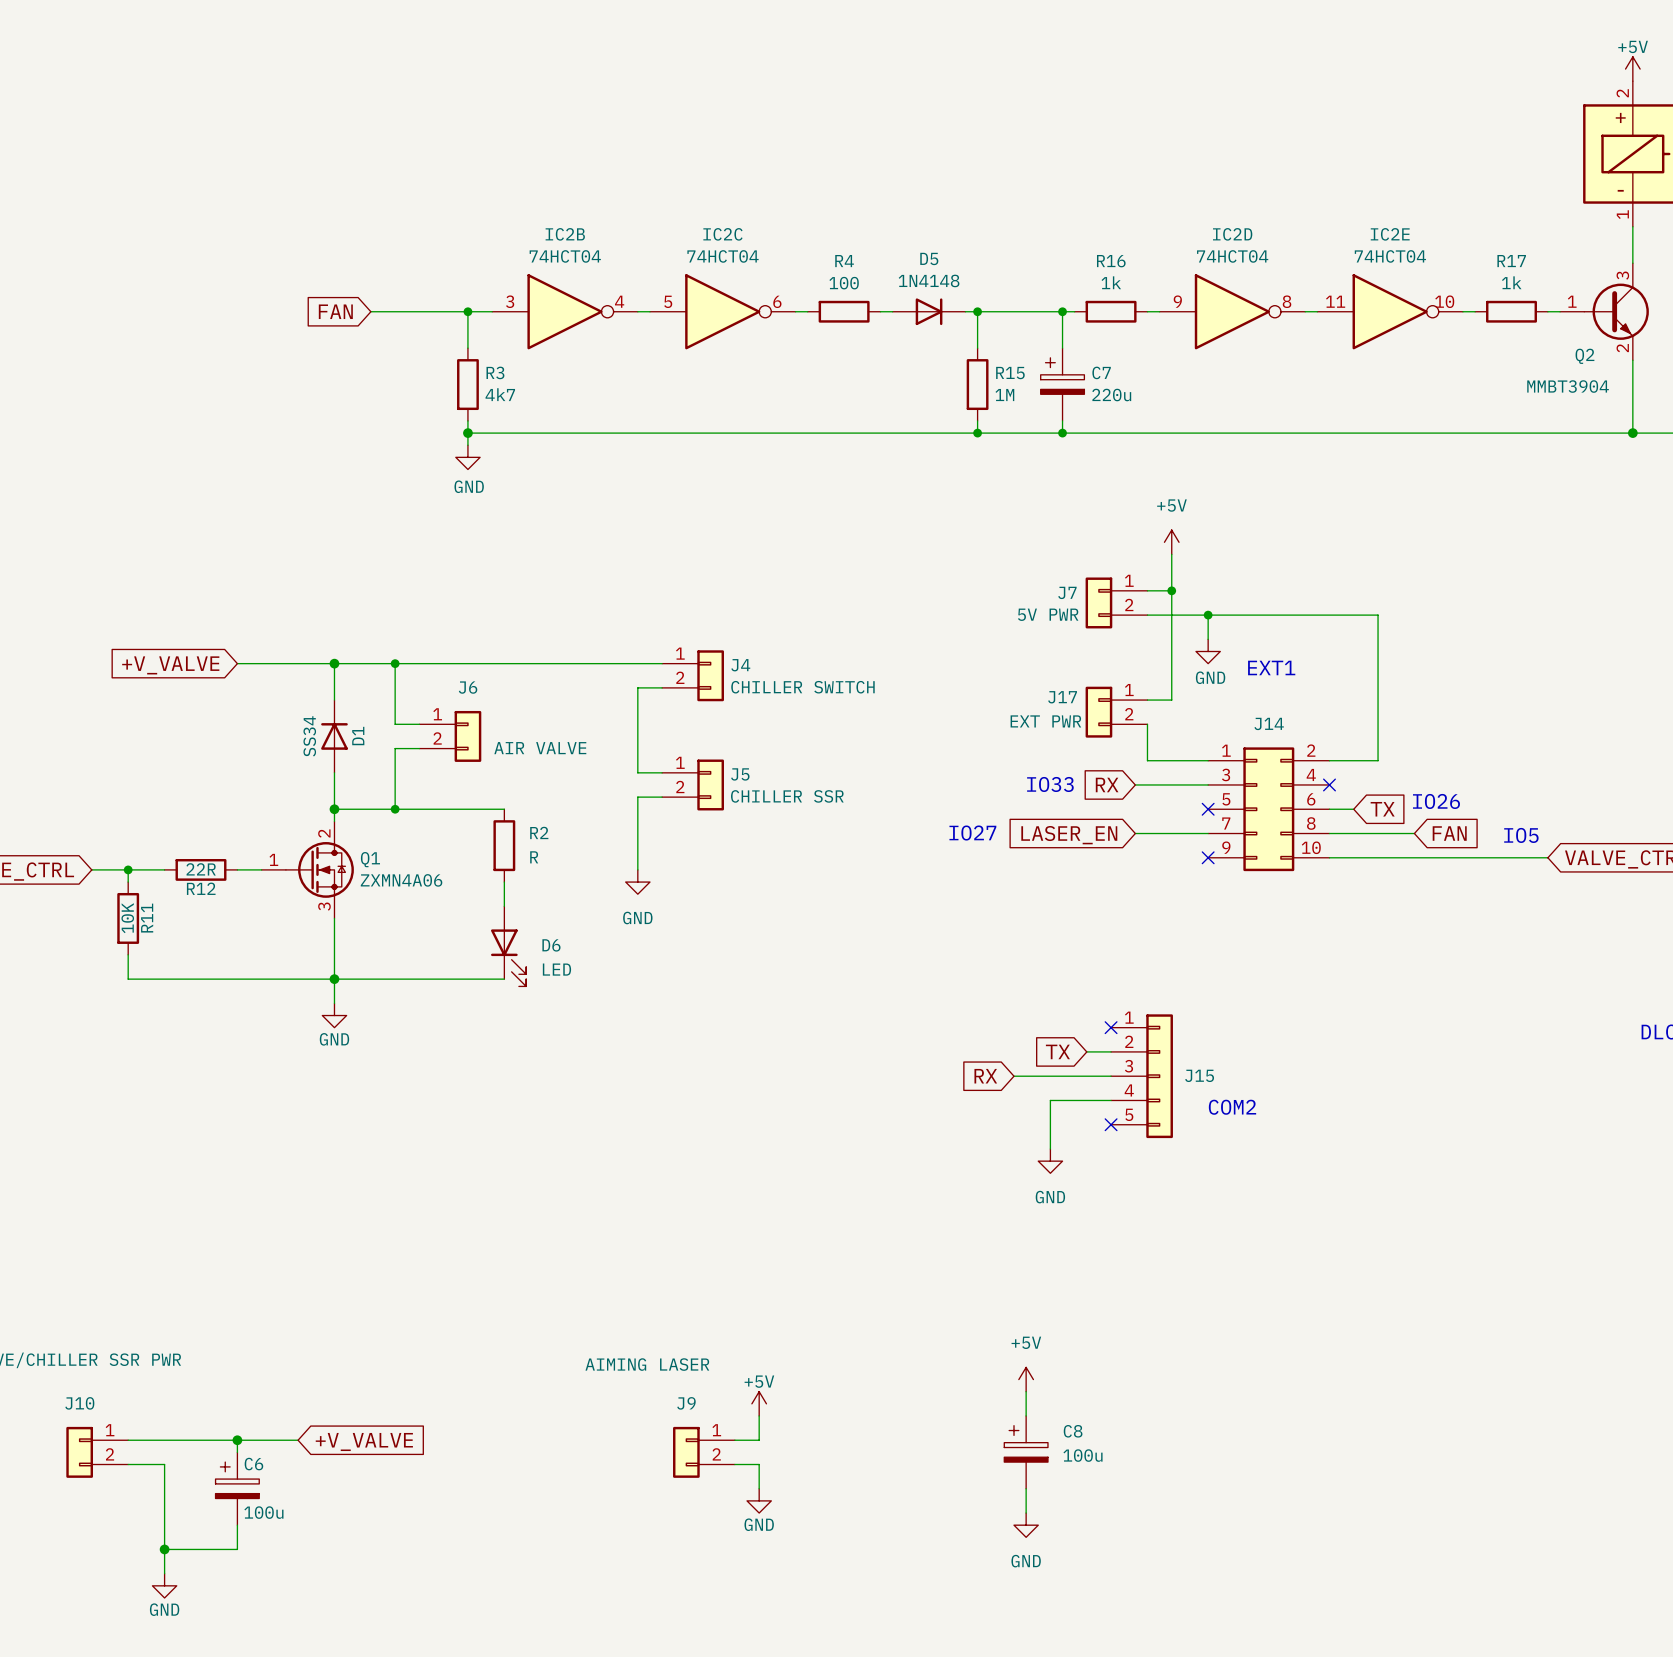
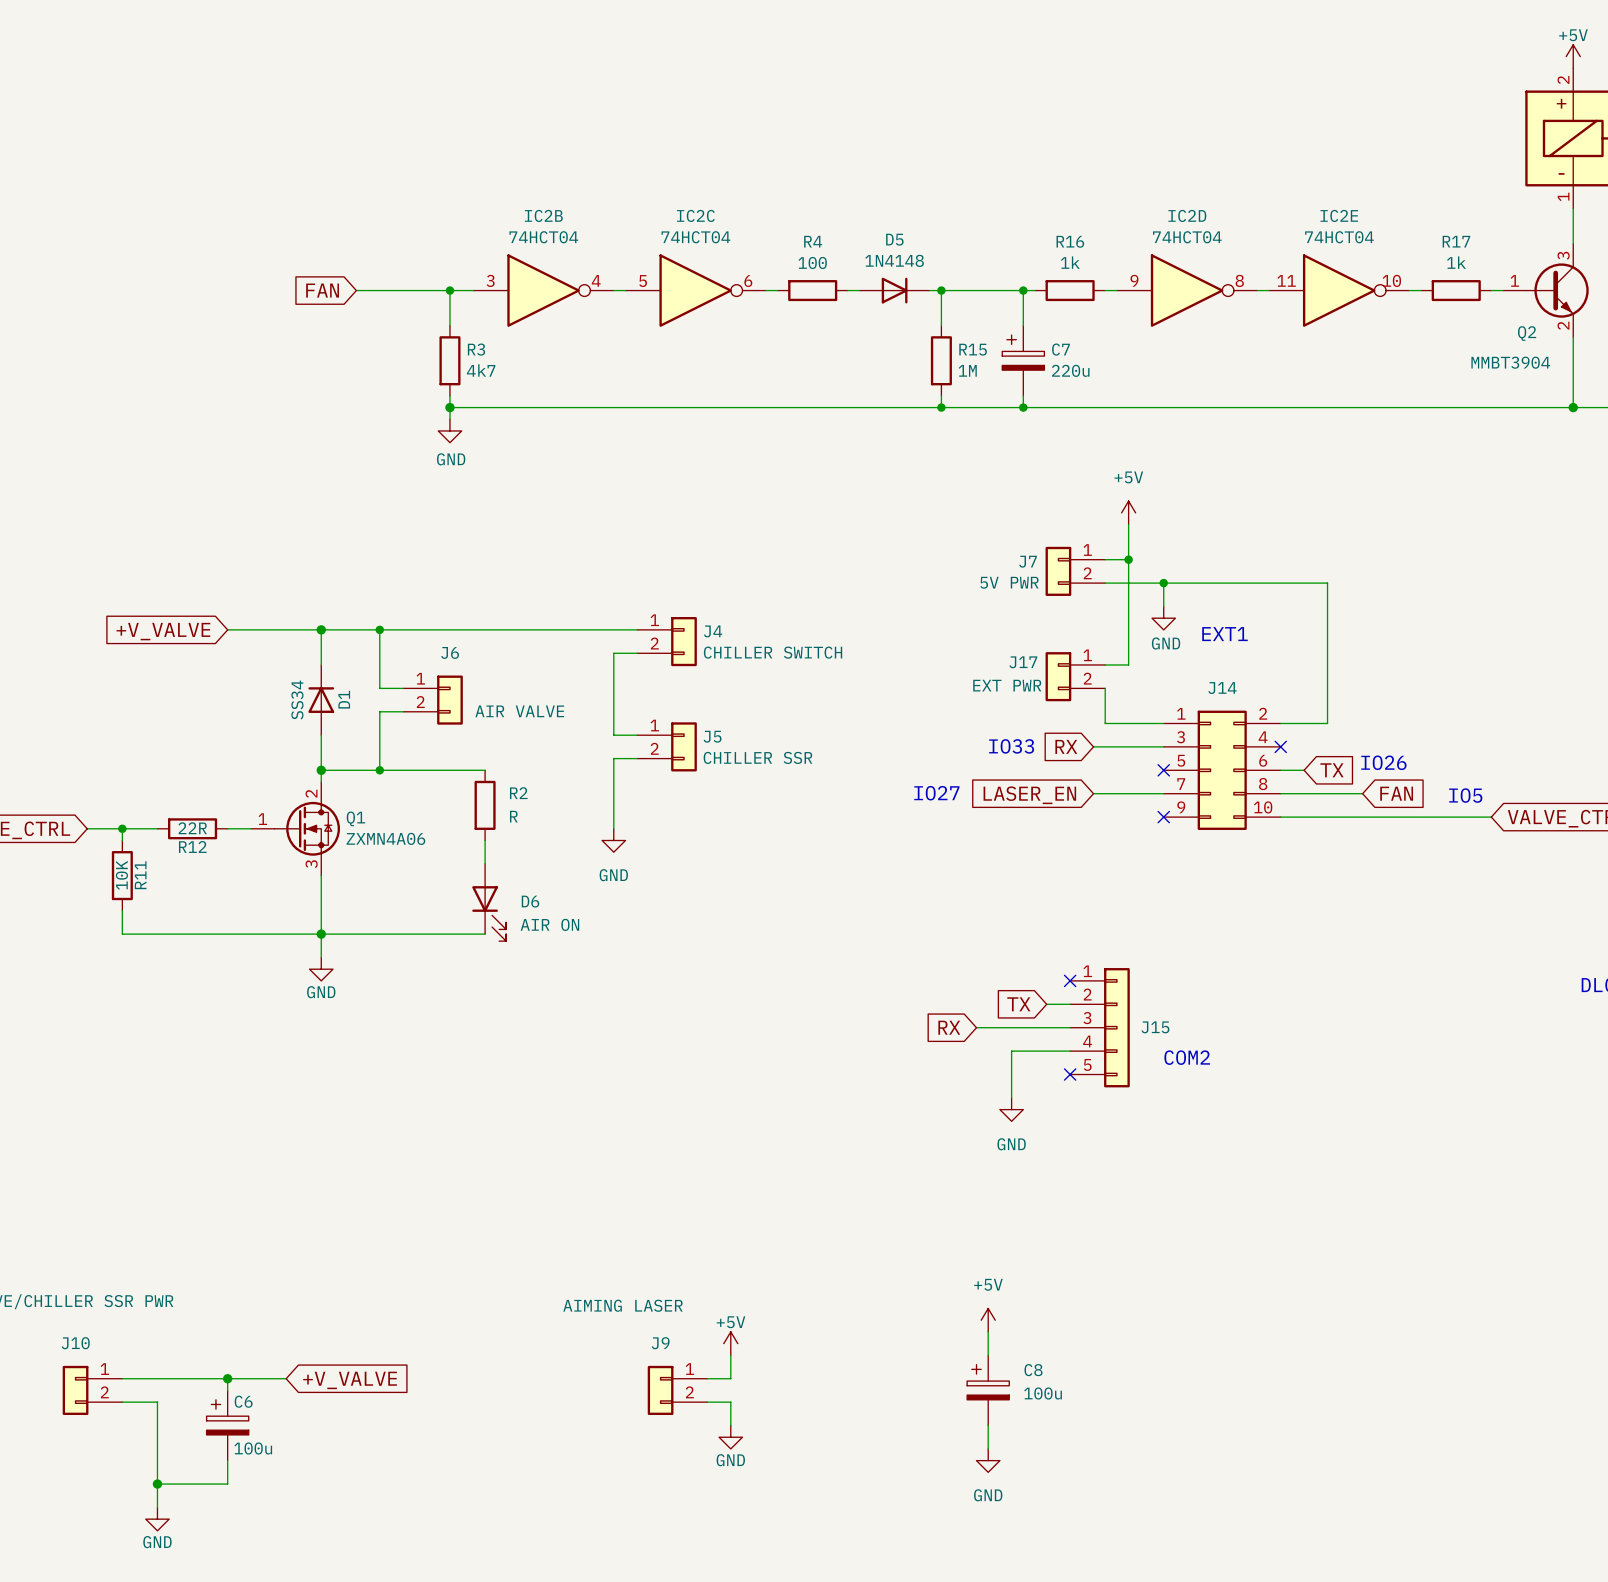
D6 value: LED (556, 969) -> AIR ON (549, 924)

